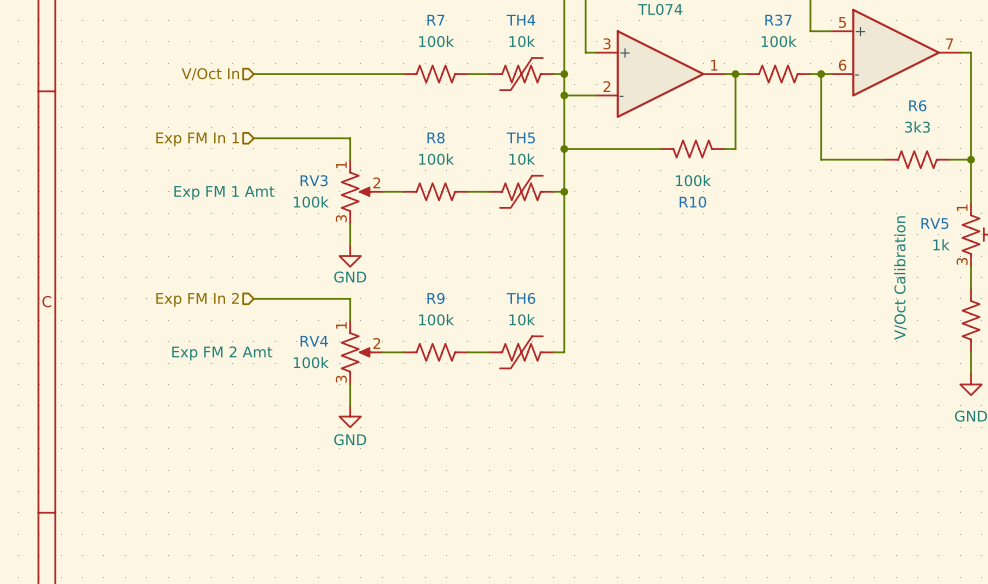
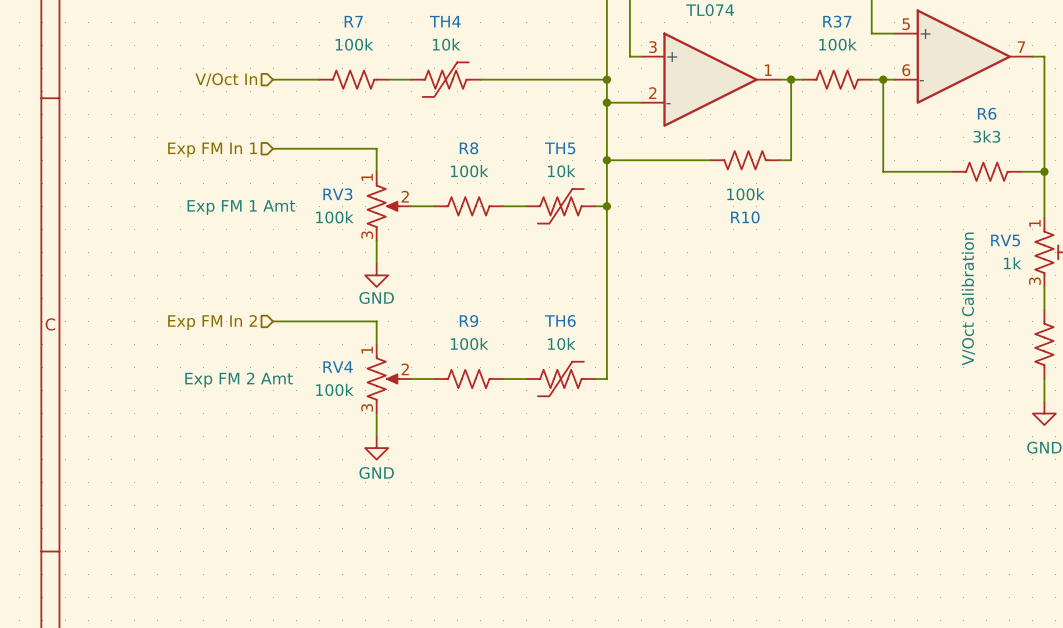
R7 position: (435, 74) -> (353, 79)
TH4 position: (521, 74) -> (445, 79)

